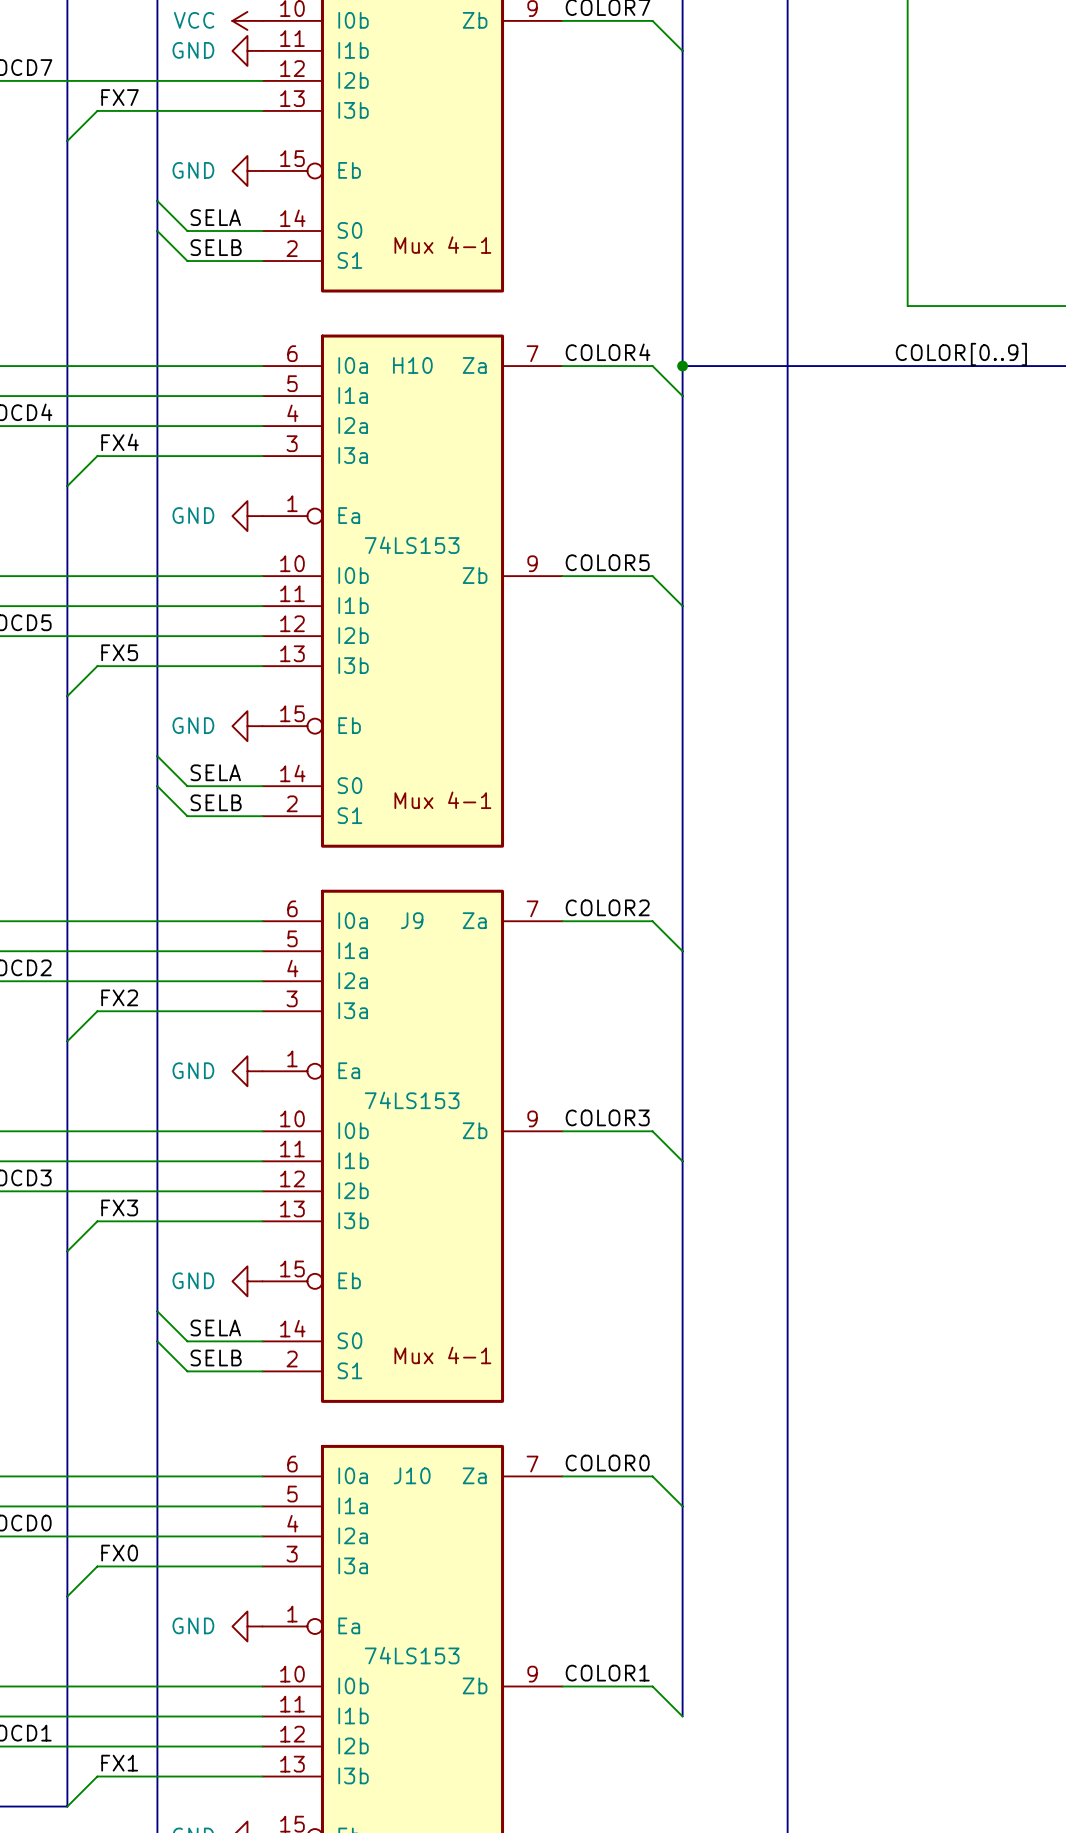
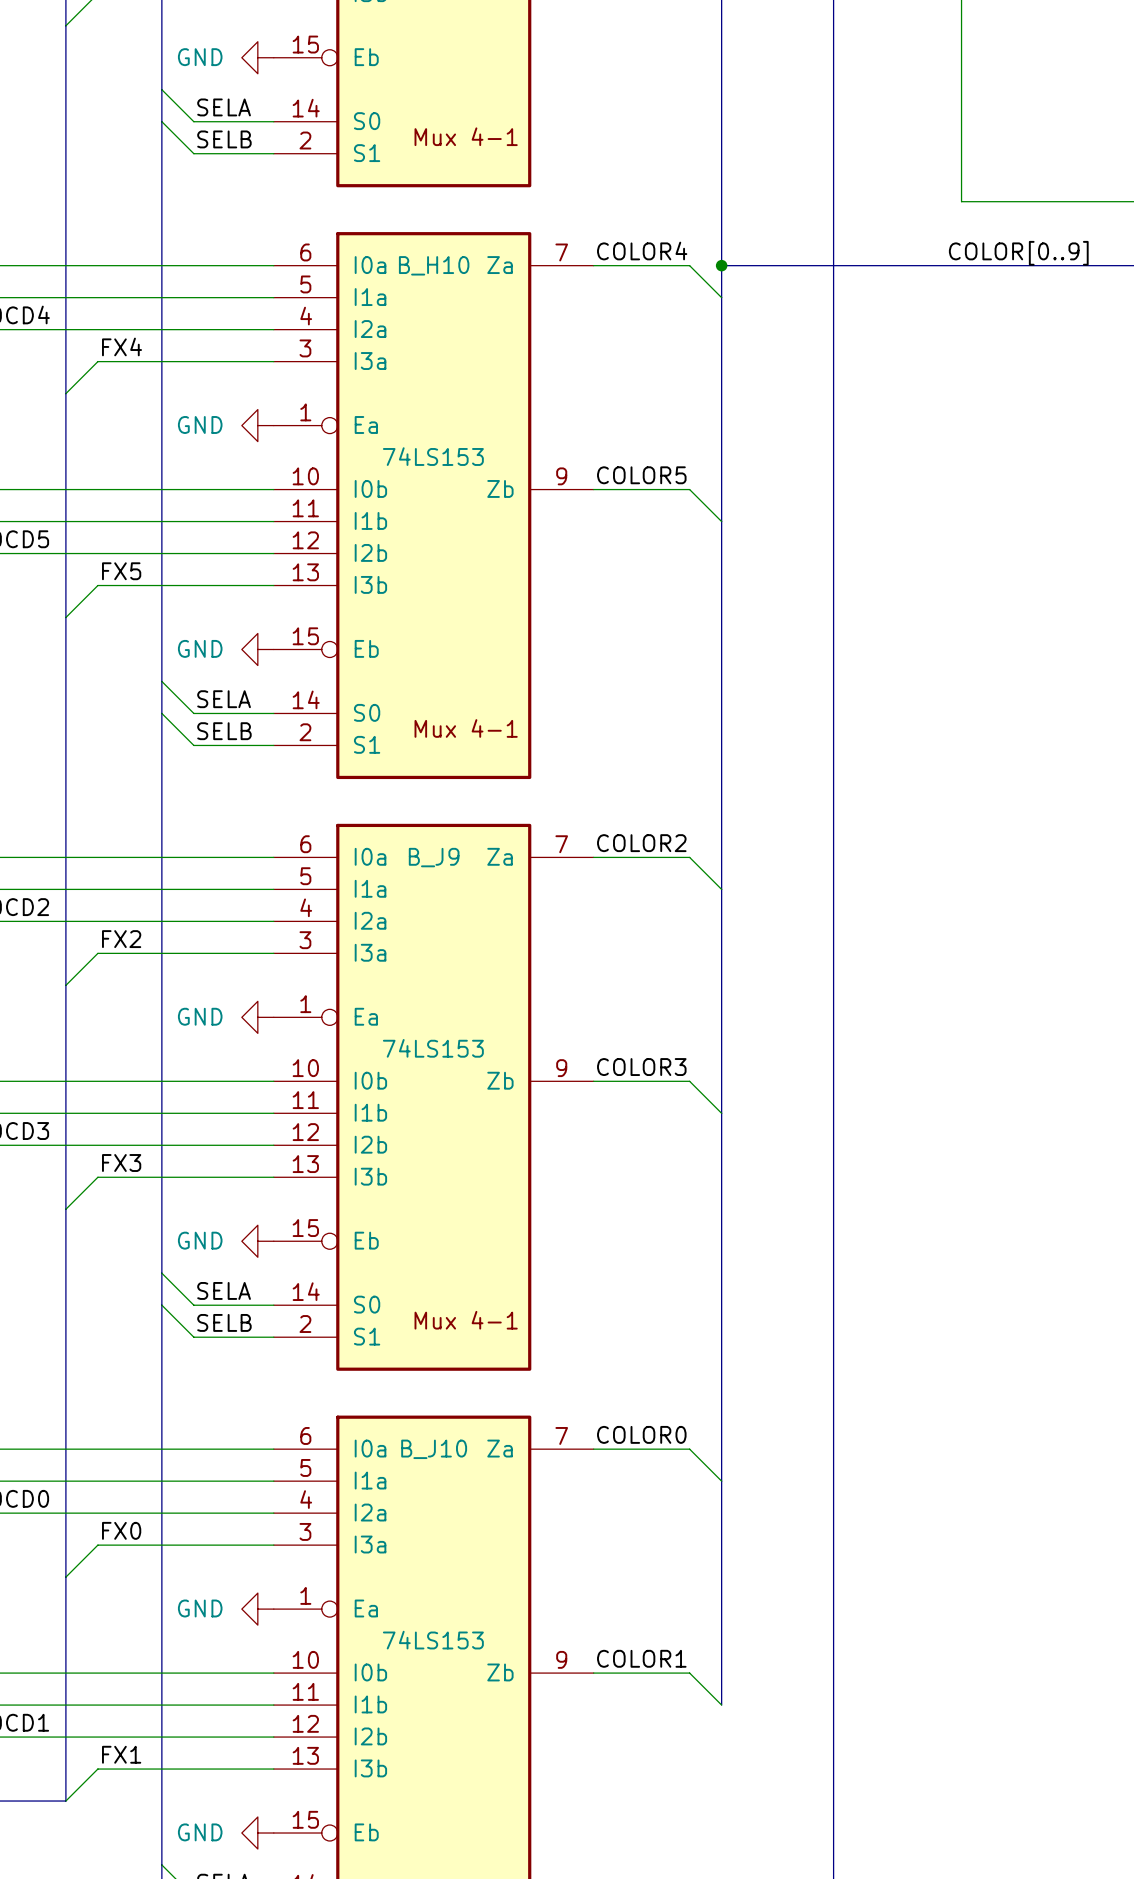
H10 name: H10 (412, 365) -> B_H10 (434, 265)
J9 name: J9 (412, 920) -> B_J9 (434, 857)
J10 name: J10 (412, 1475) -> B_J10 (434, 1449)

